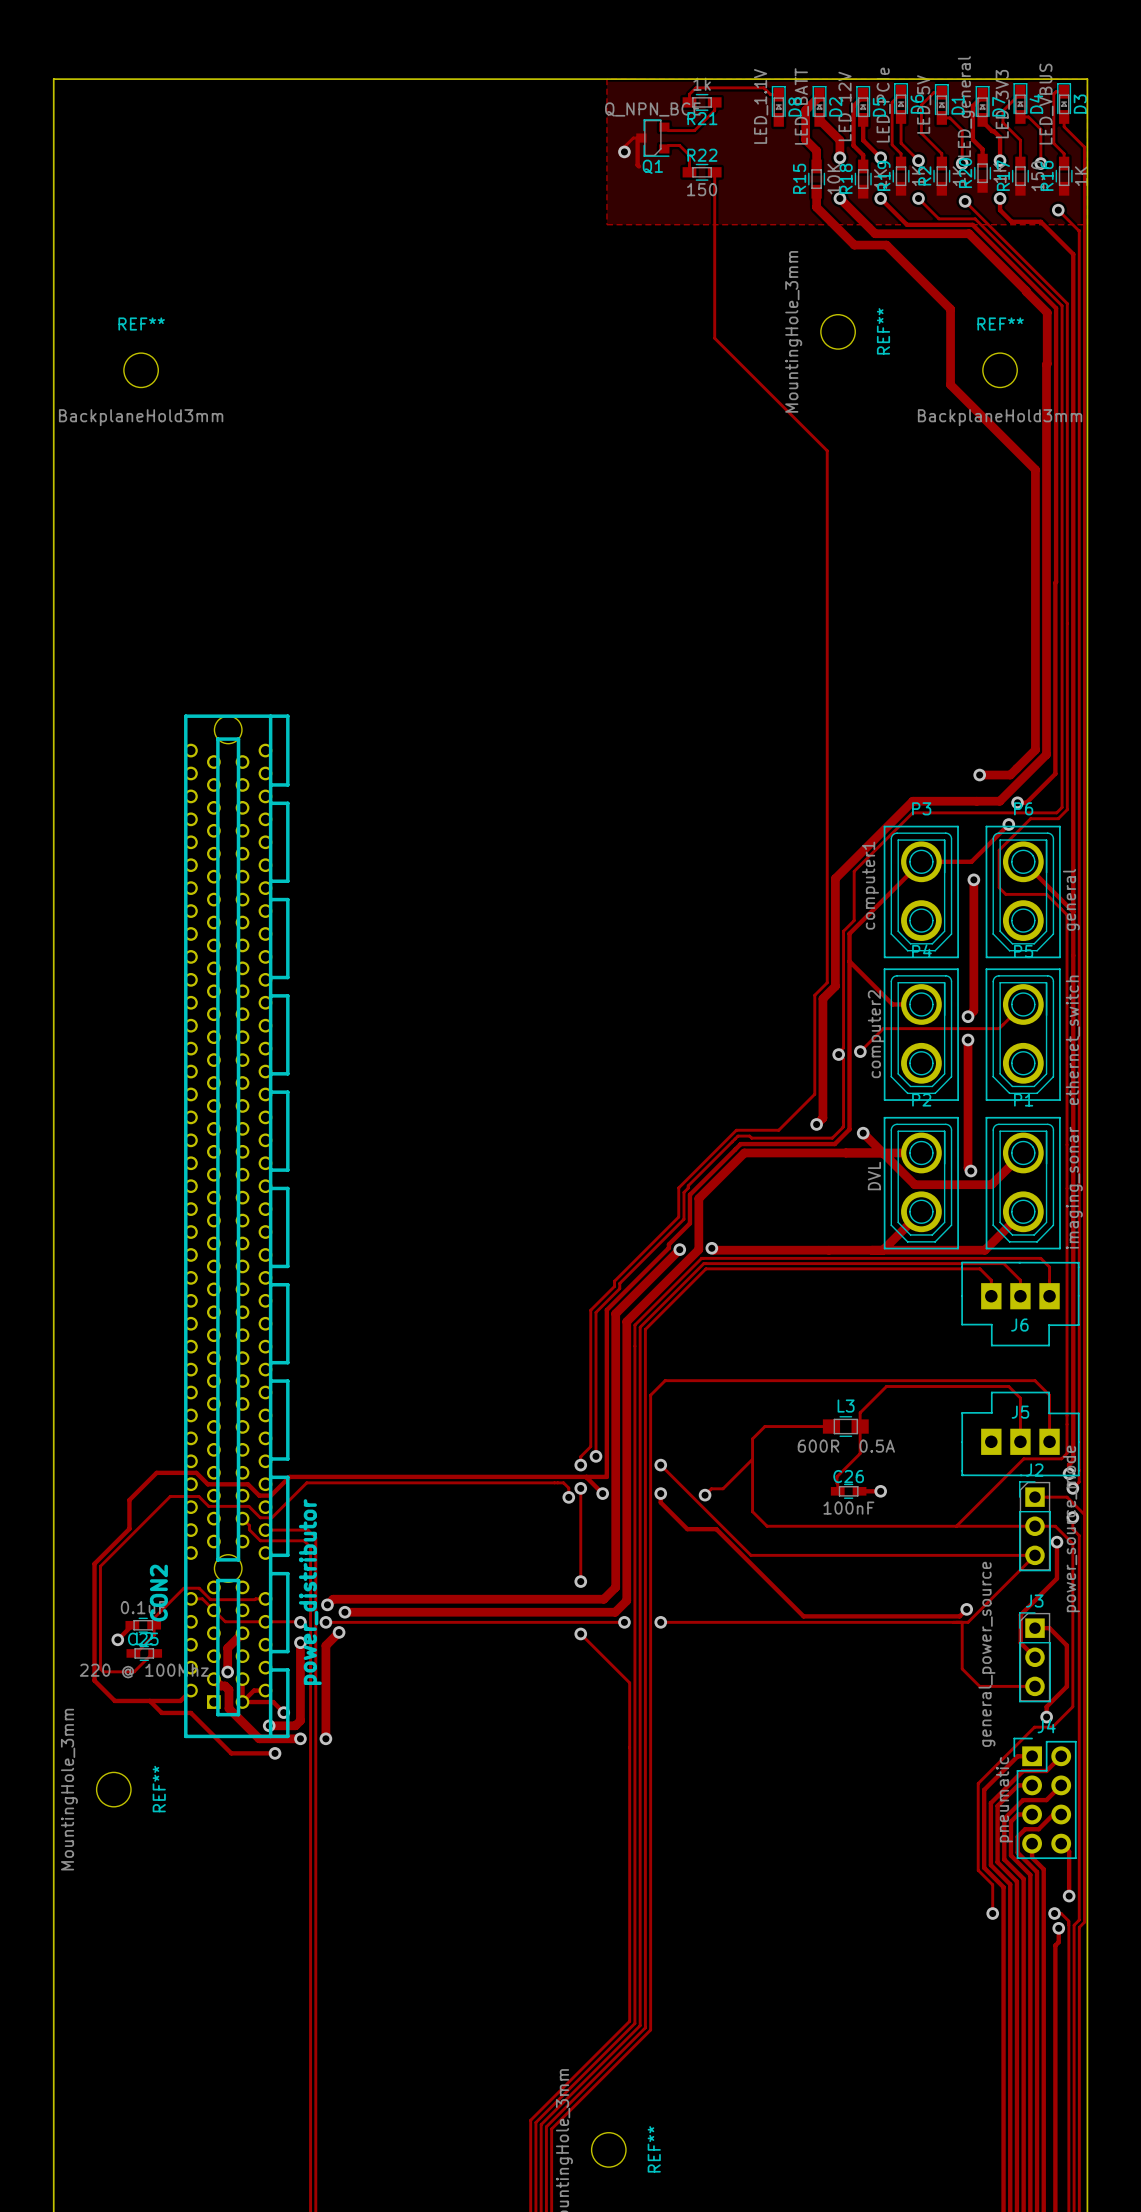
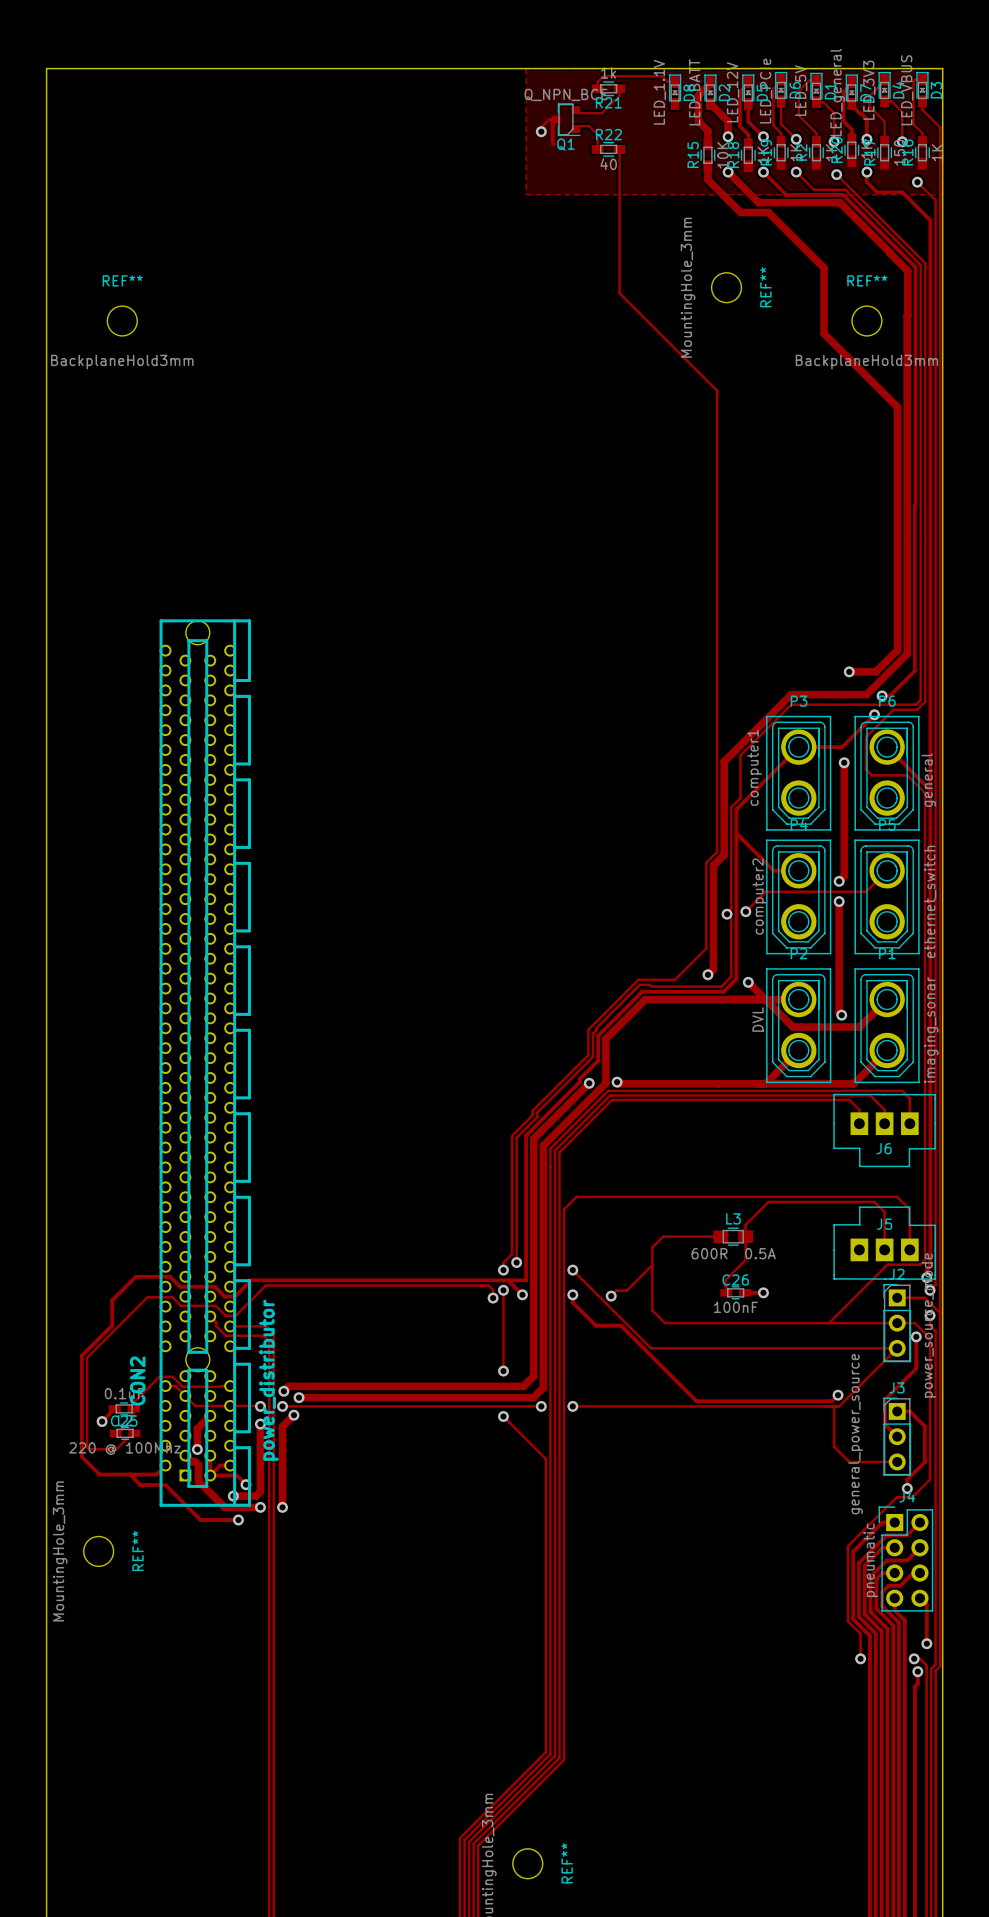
R22 value: 150 (702, 189) -> 40 (608, 164)

